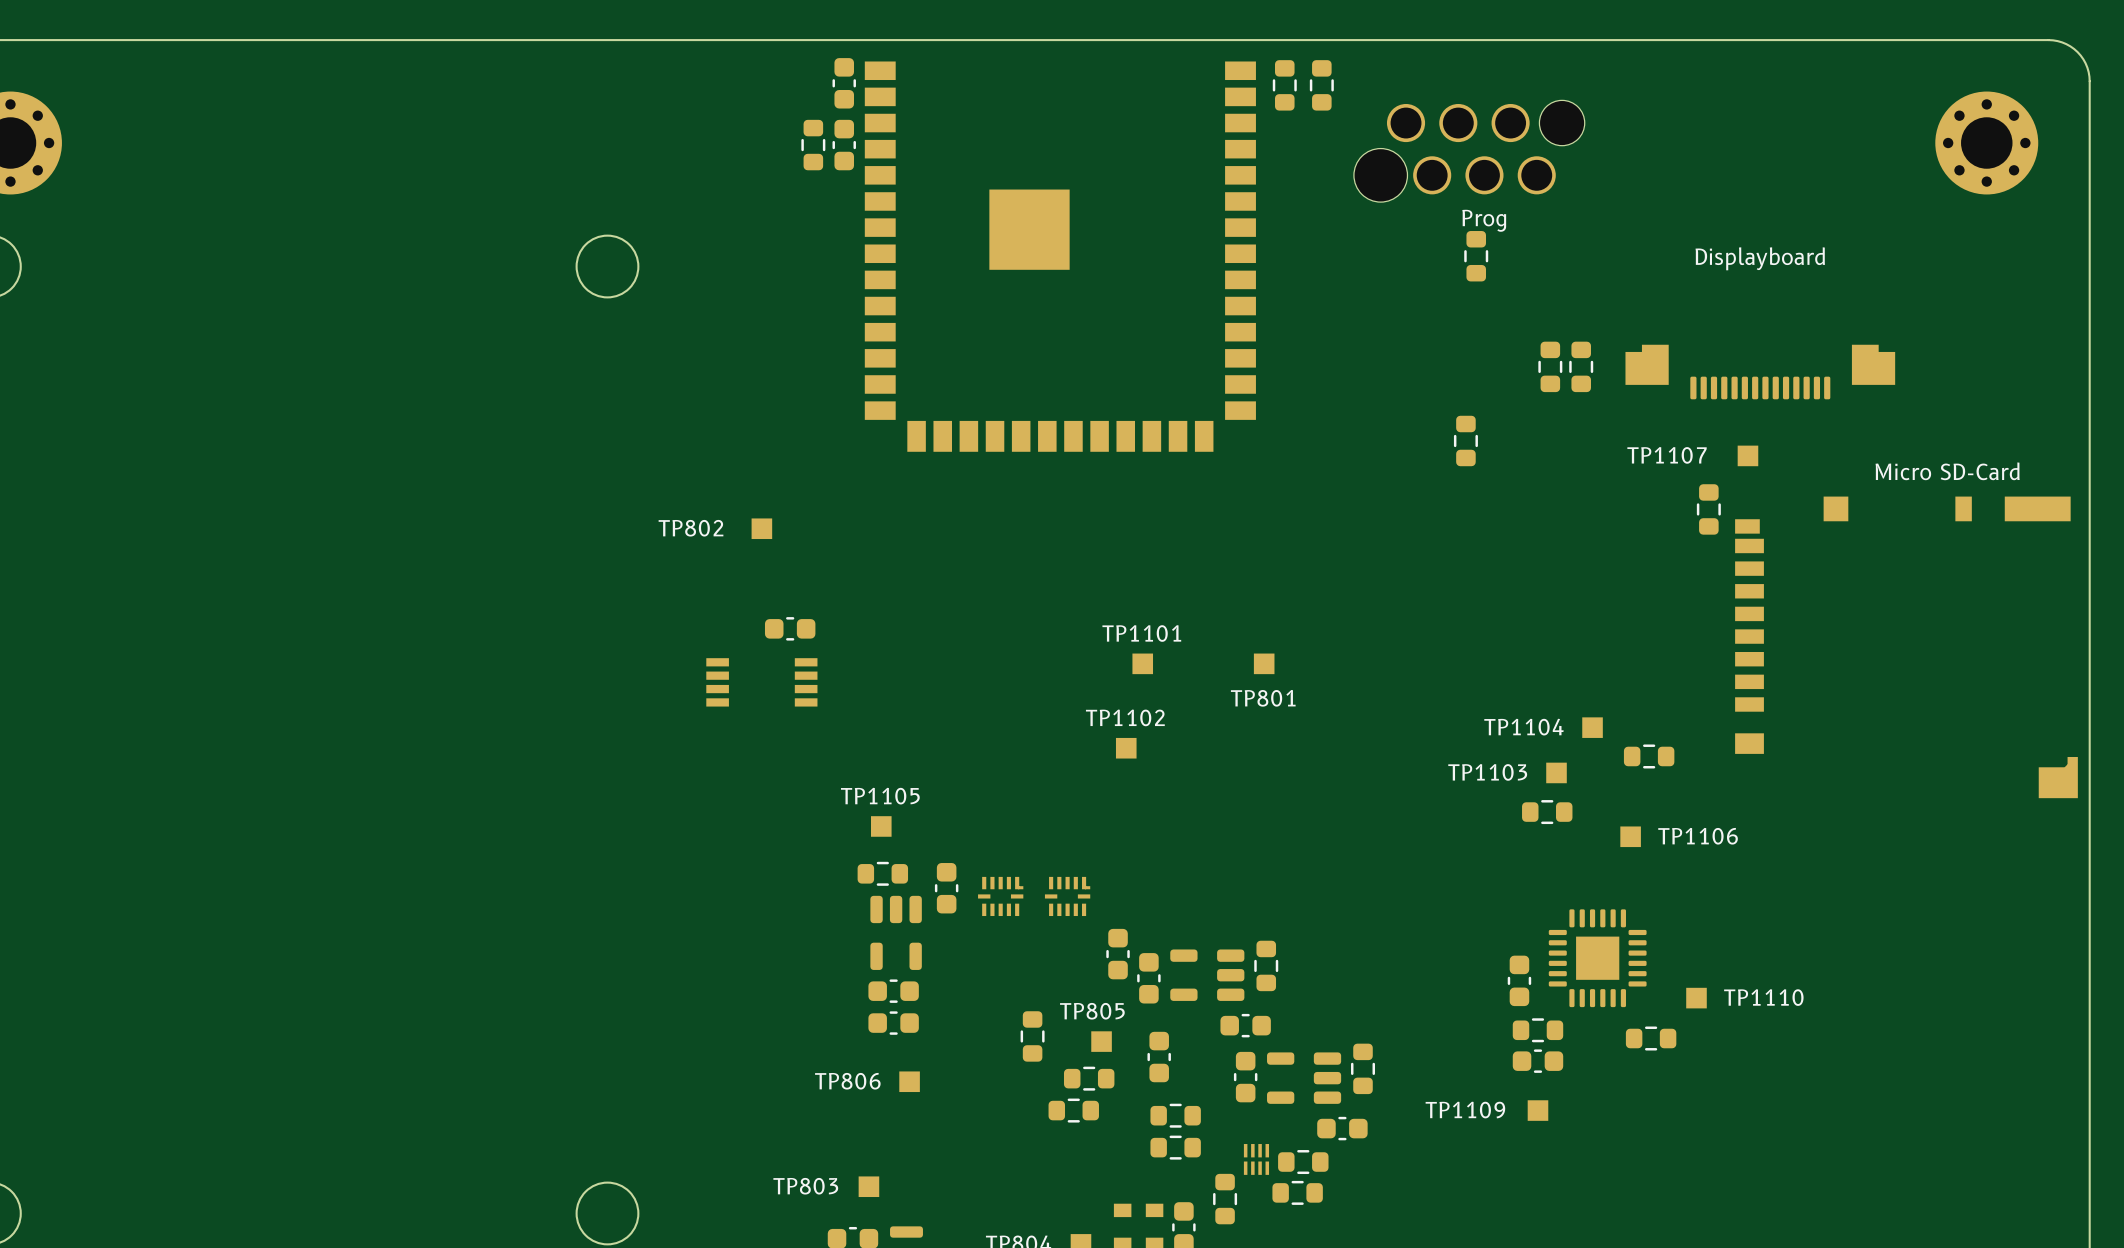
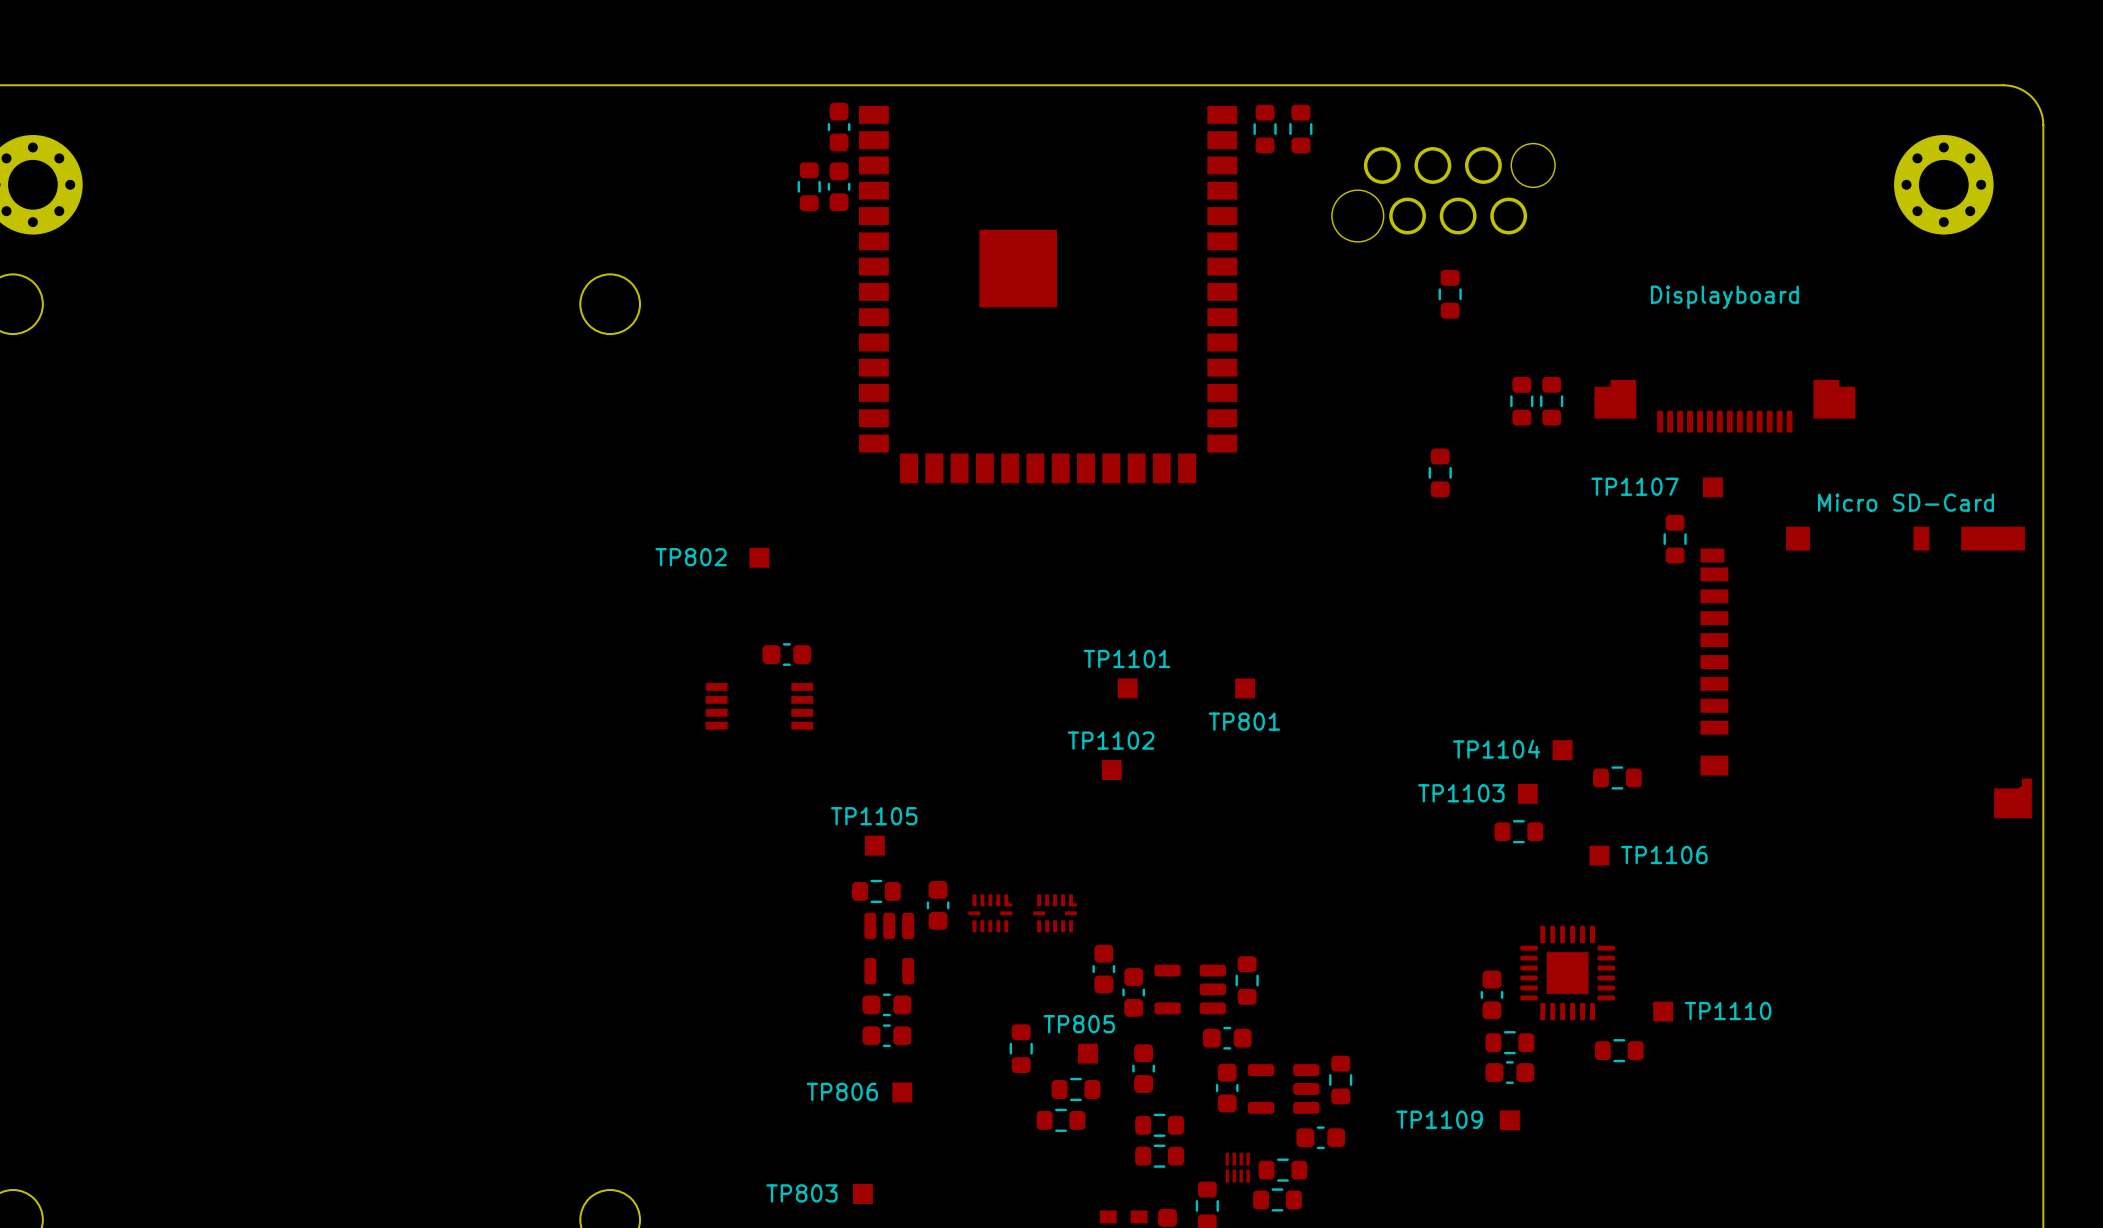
part value: Prog (1484, 220) -> none

